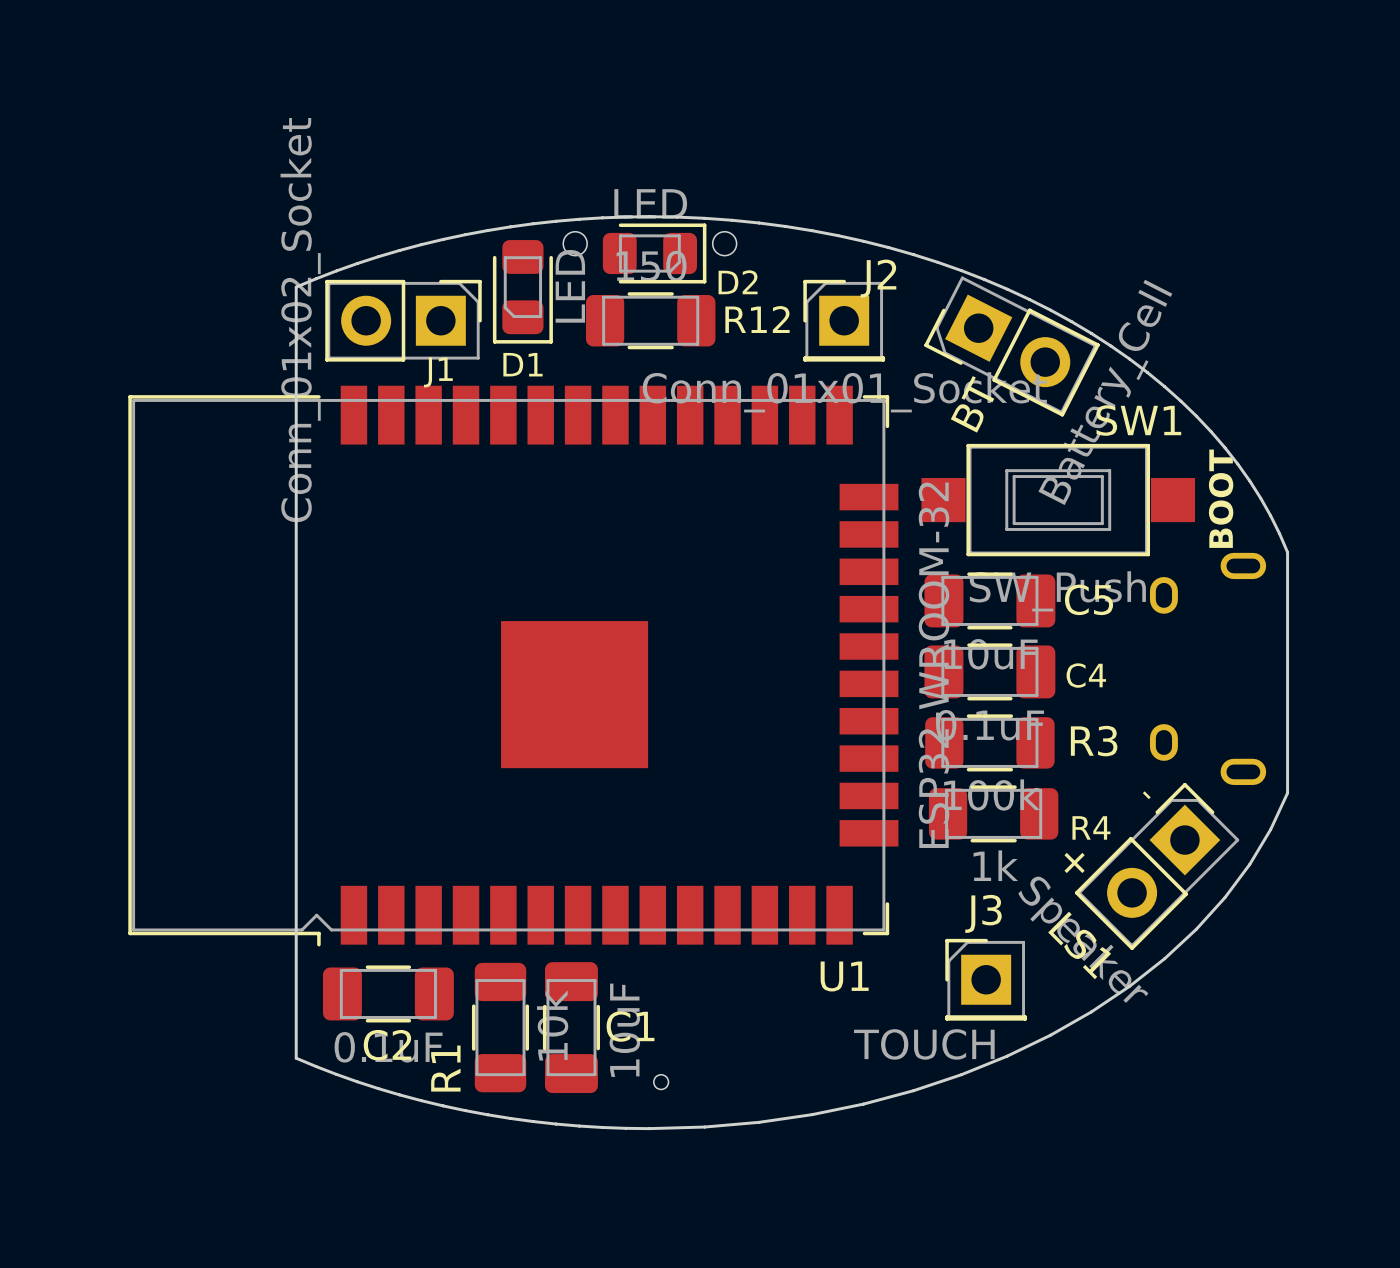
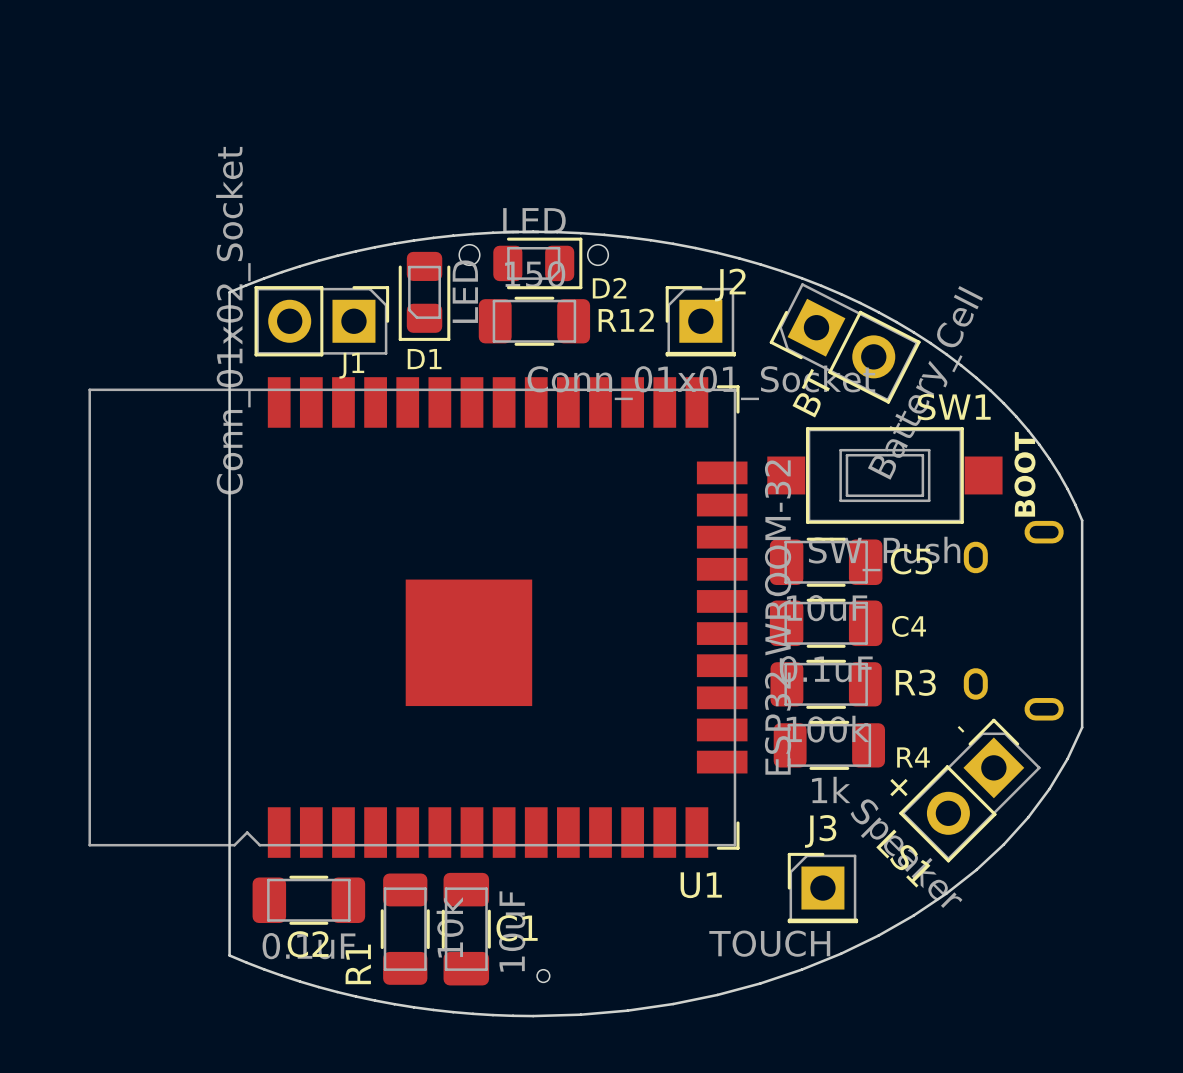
U1 footprint: [128, 385, 899, 947] -> [88, 377, 748, 858]

